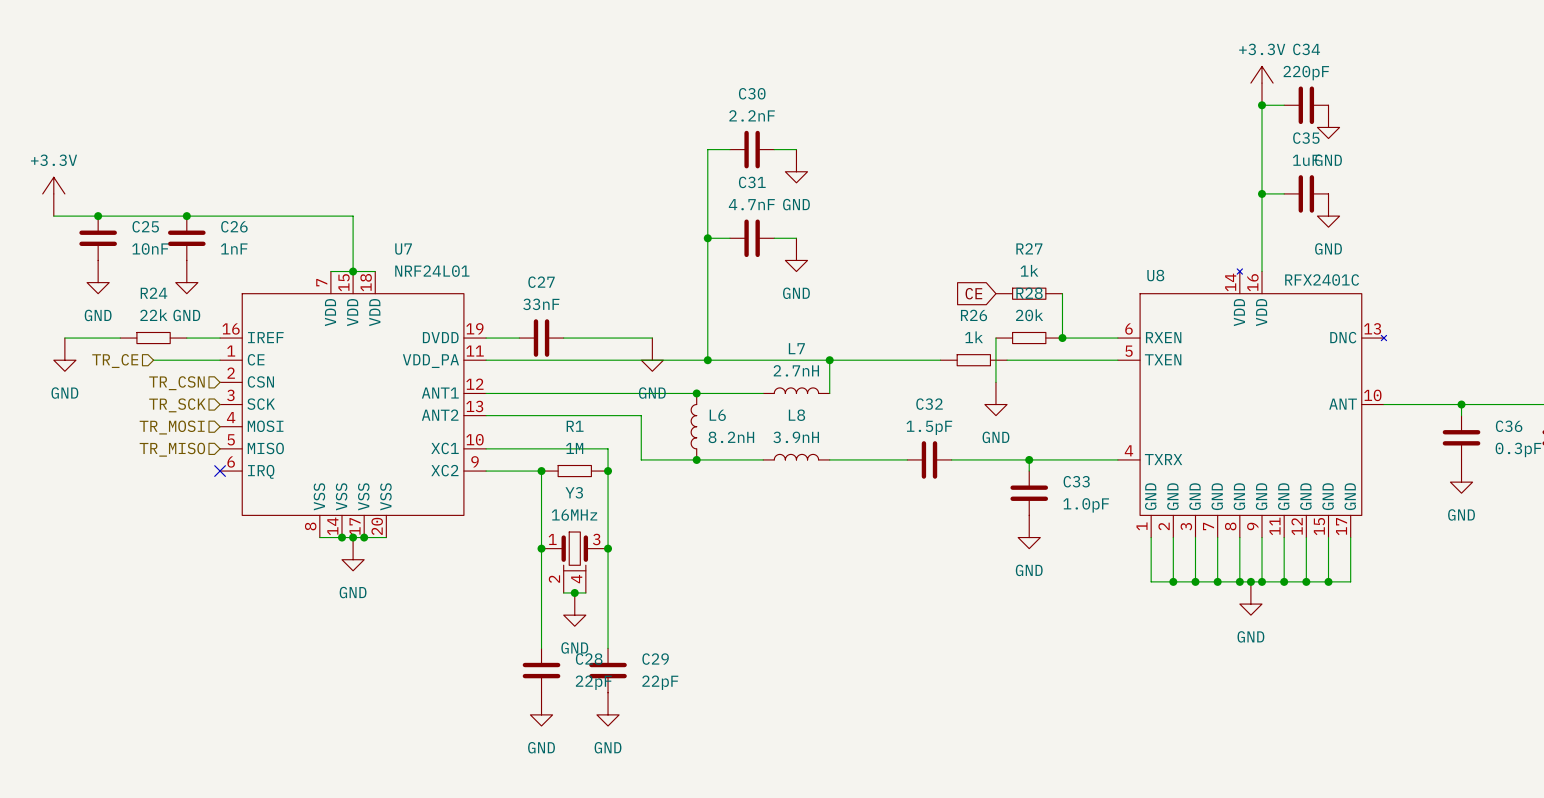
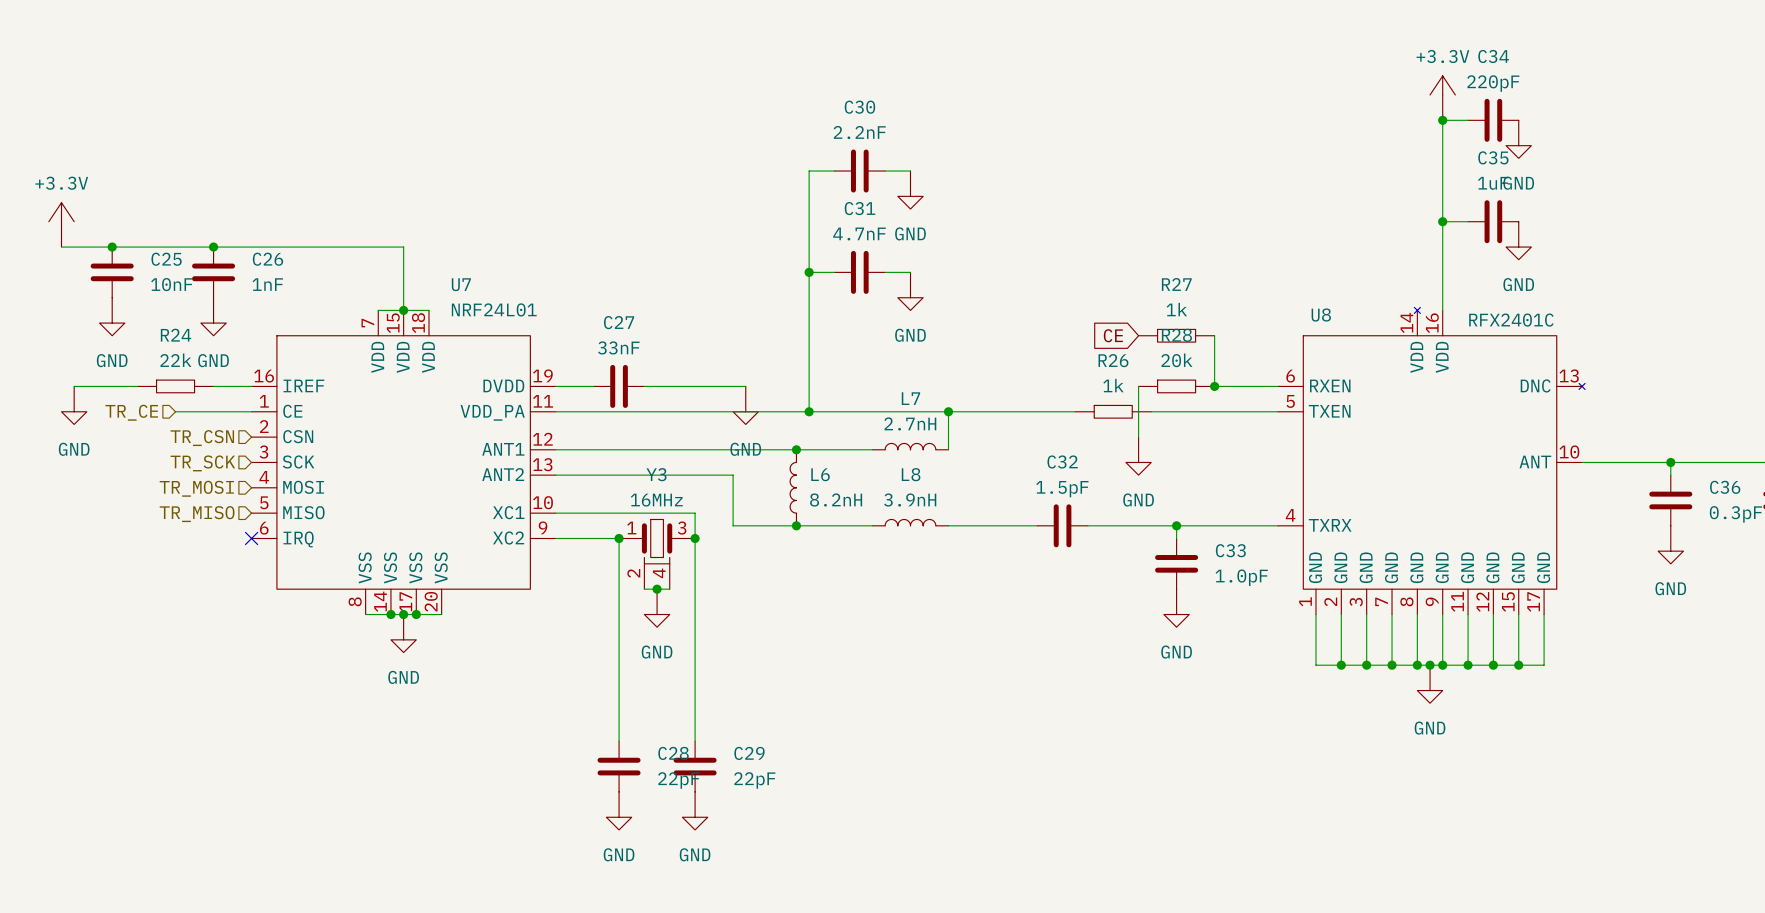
R1: 1M (574, 471) -> none
junction: none -> (657, 589)
junction: (541, 548) -> none
junction: (608, 548) -> none
Y3 position: (574, 562) -> (657, 554)
wire: (563, 592) (585, 592) -> (644, 589) (669, 589)
junction: (574, 592) -> none
power symbol position: GND (574, 609) -> GND (657, 608)

